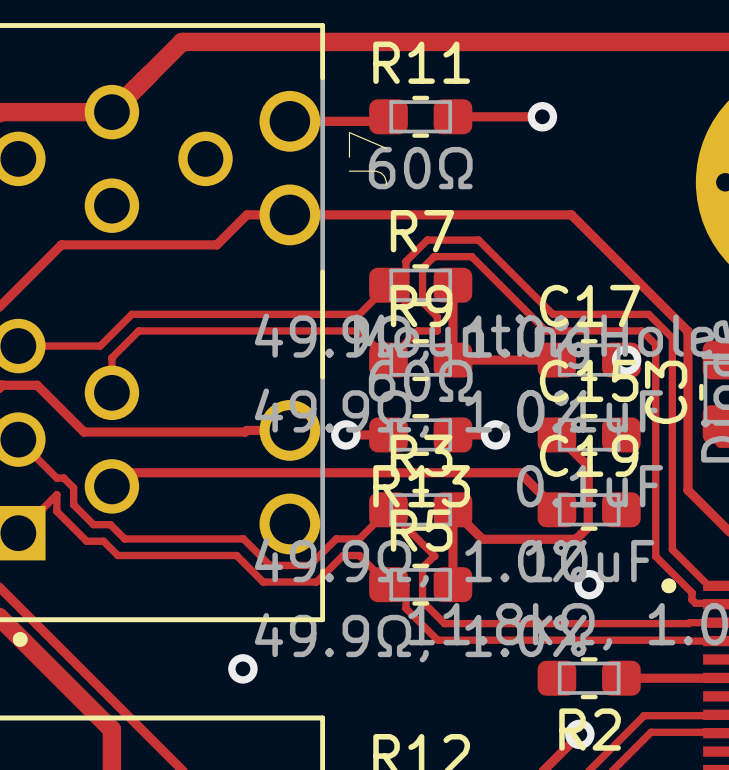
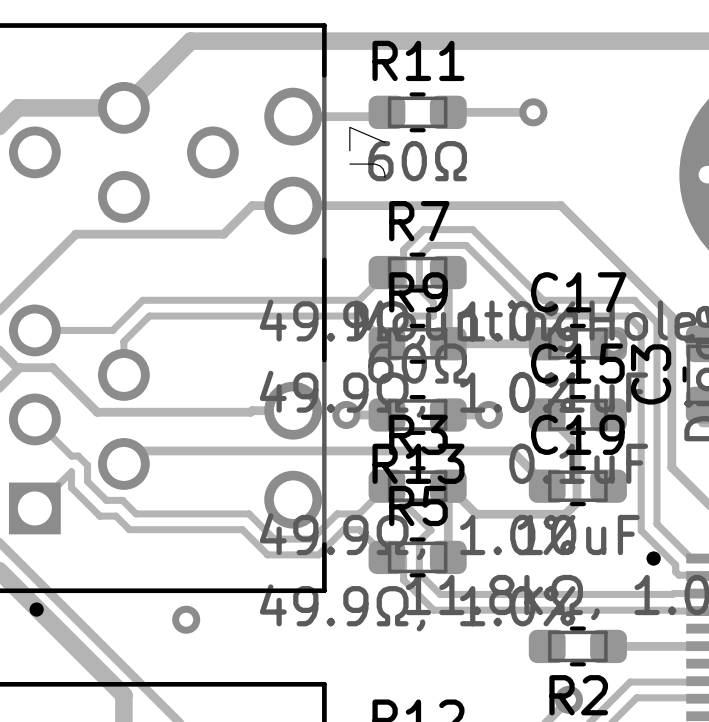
via: (589, 584) -> none
via position: (242, 668) -> (186, 619)

